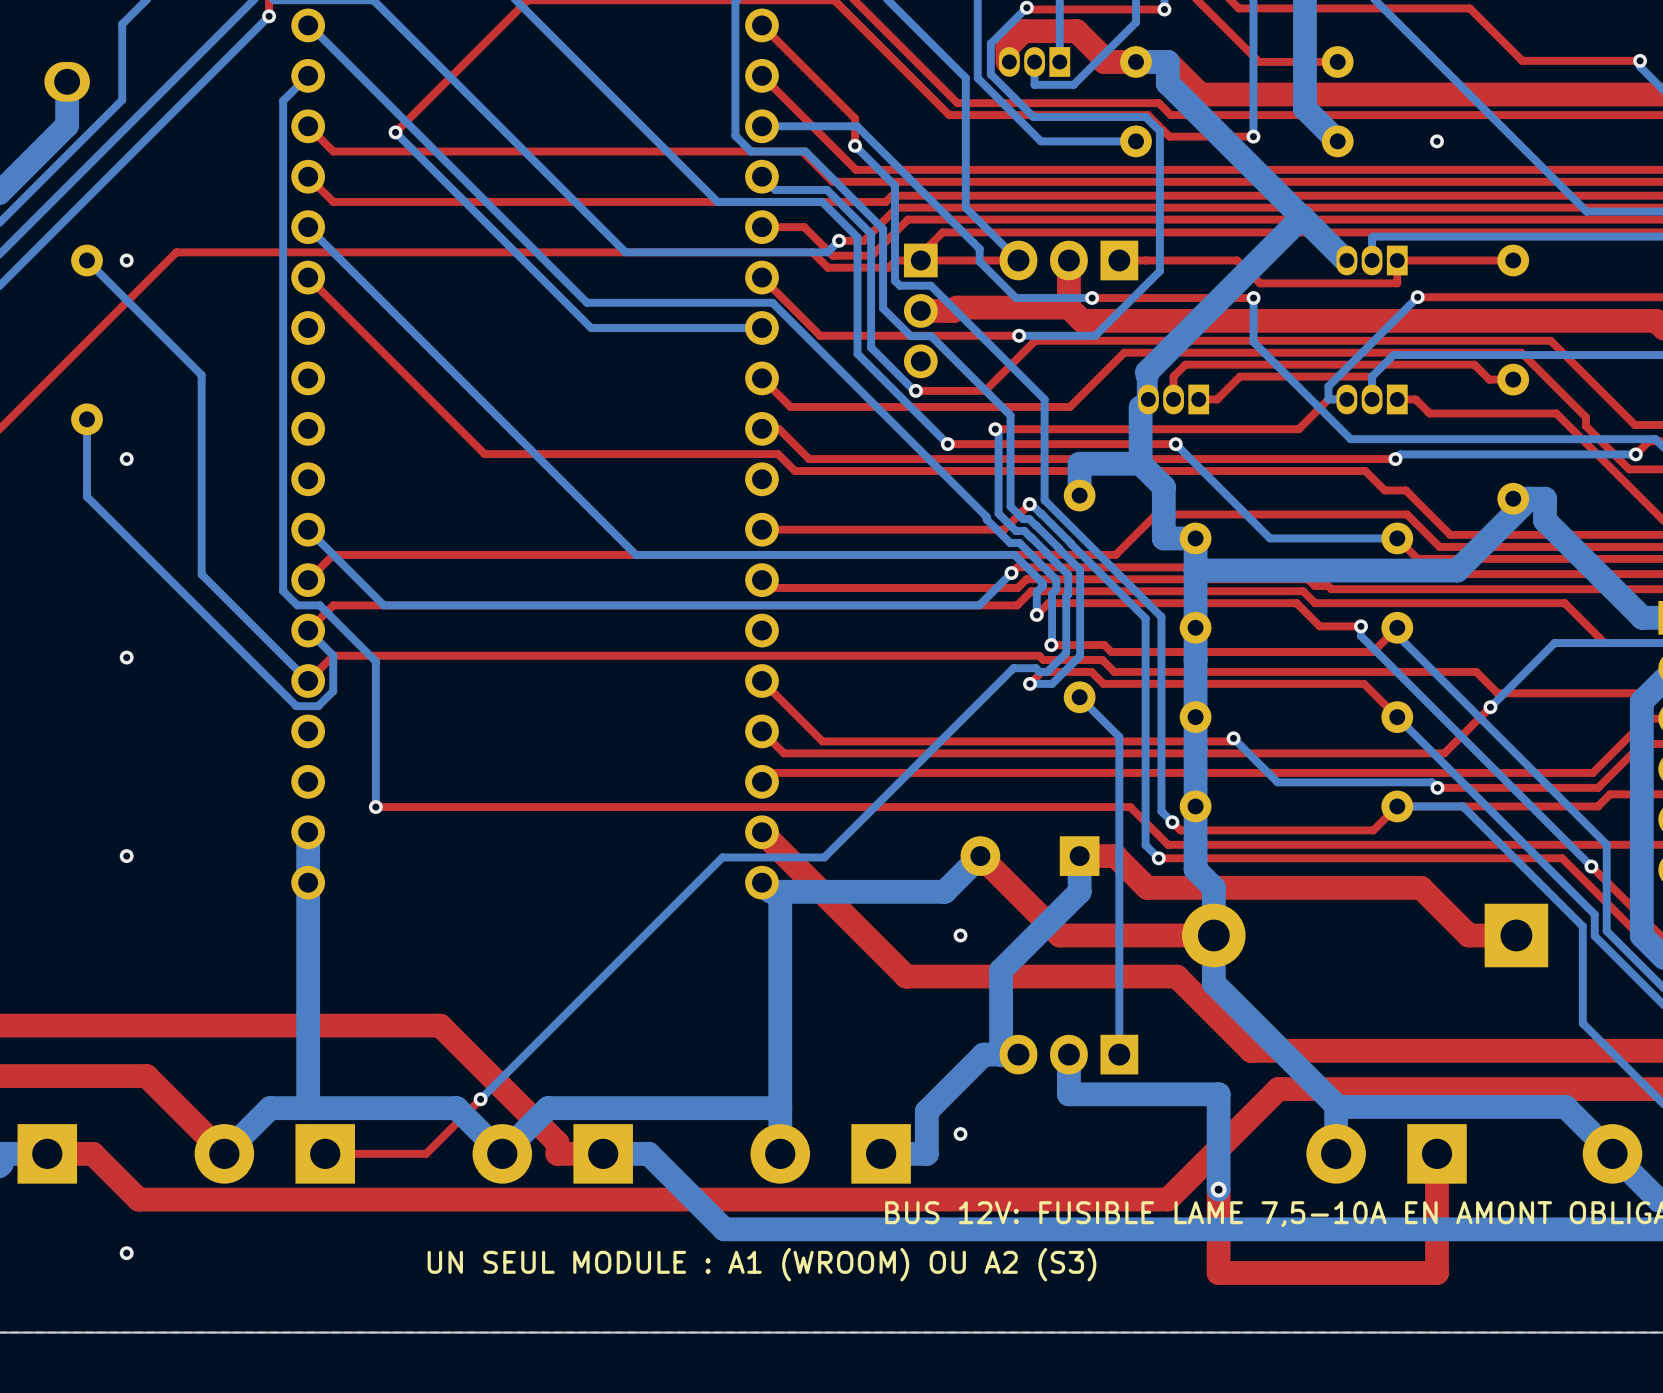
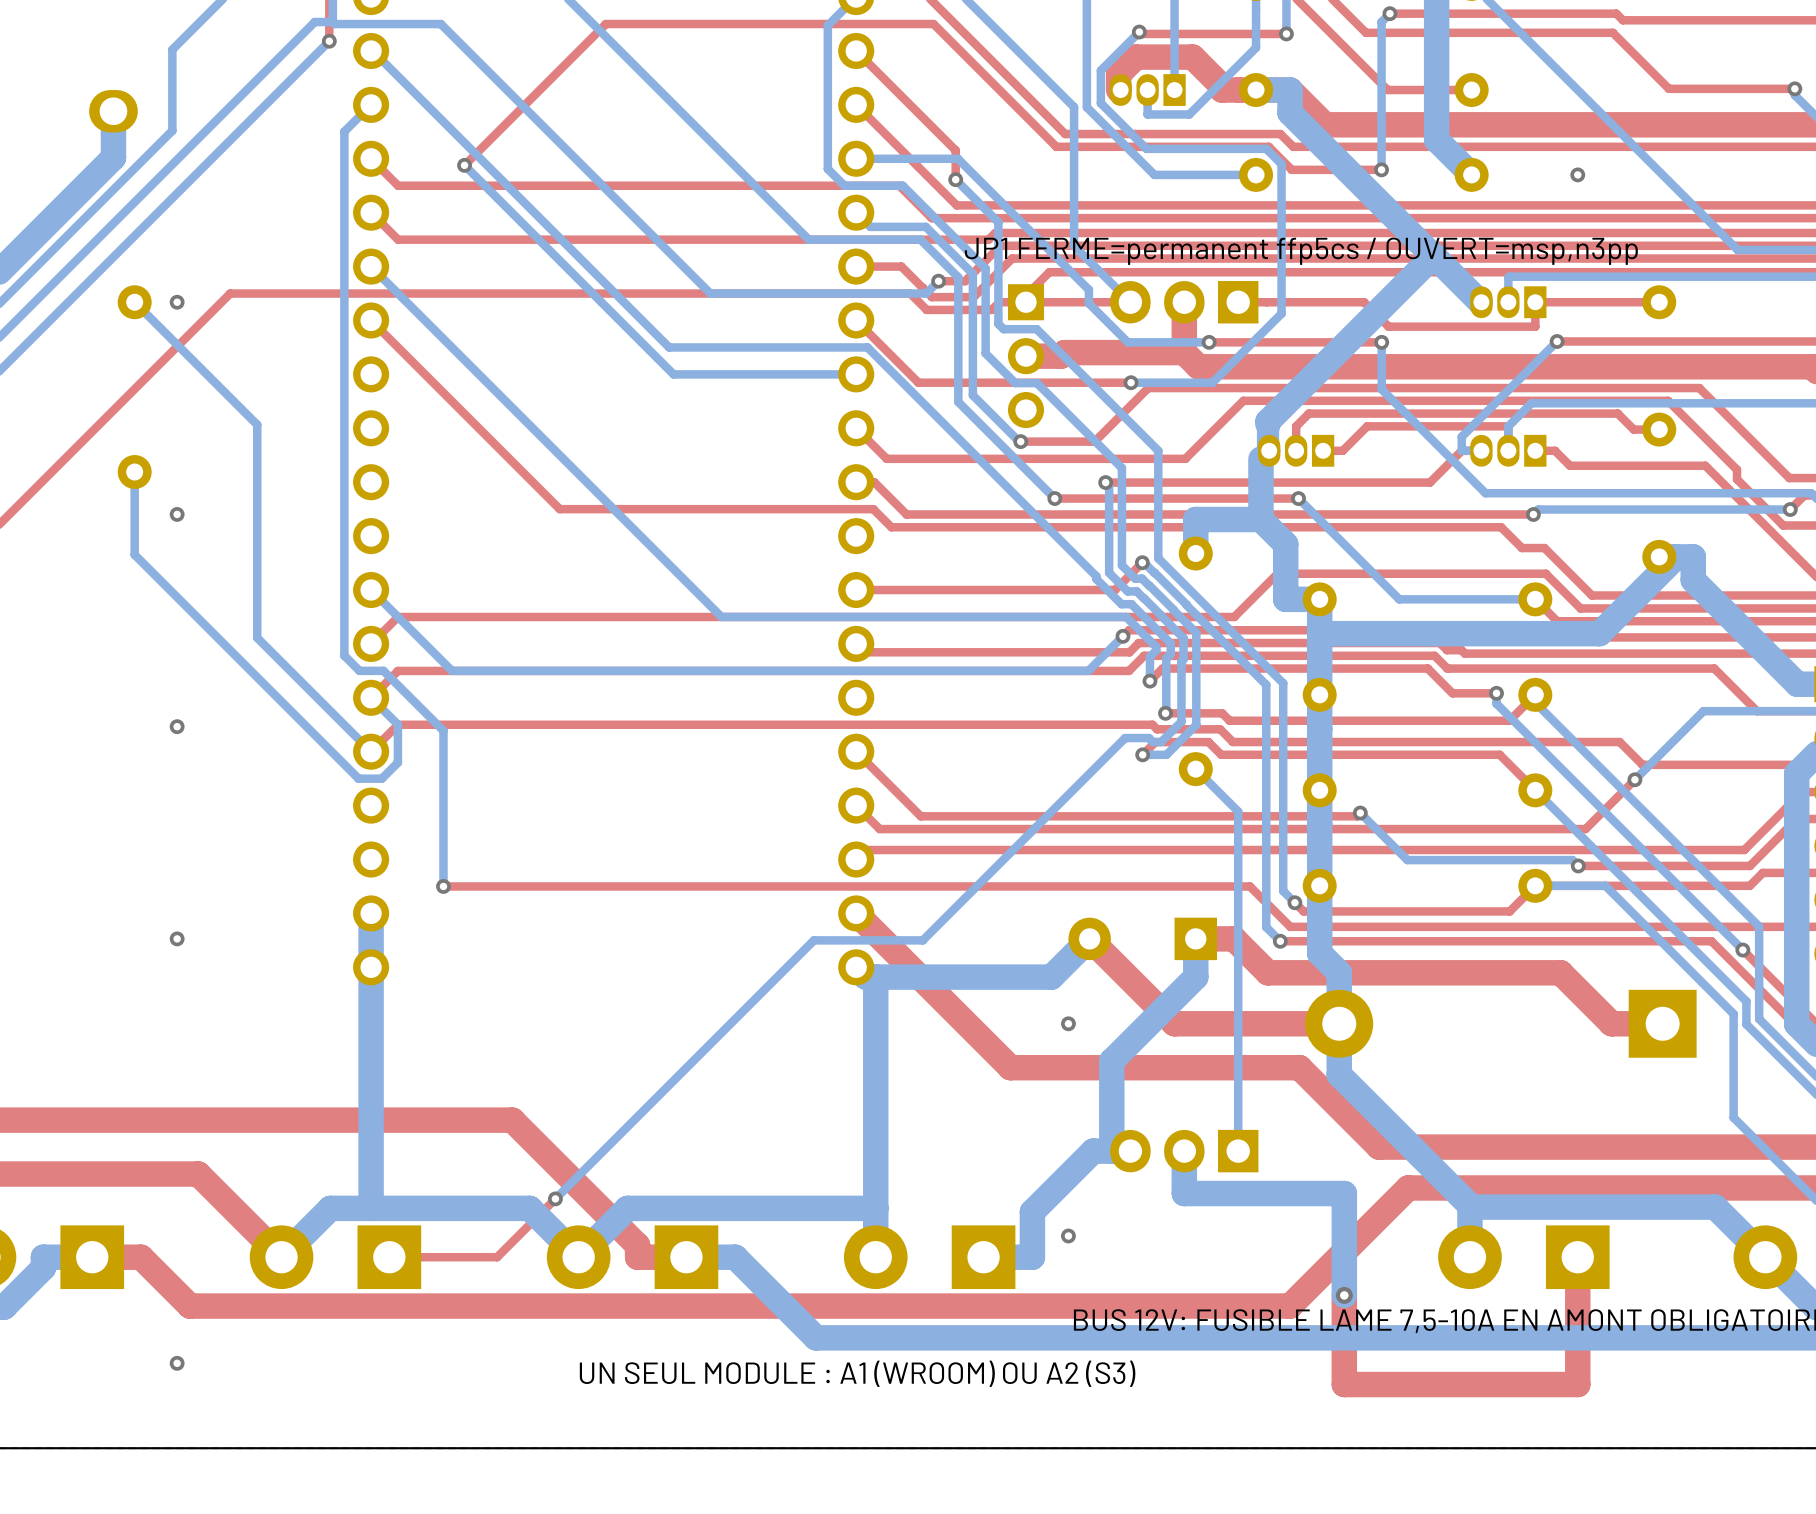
text: none -> JP1 FERME=permanent ffp5cs / OUVERT=msp,n3pp (1301, 251)

